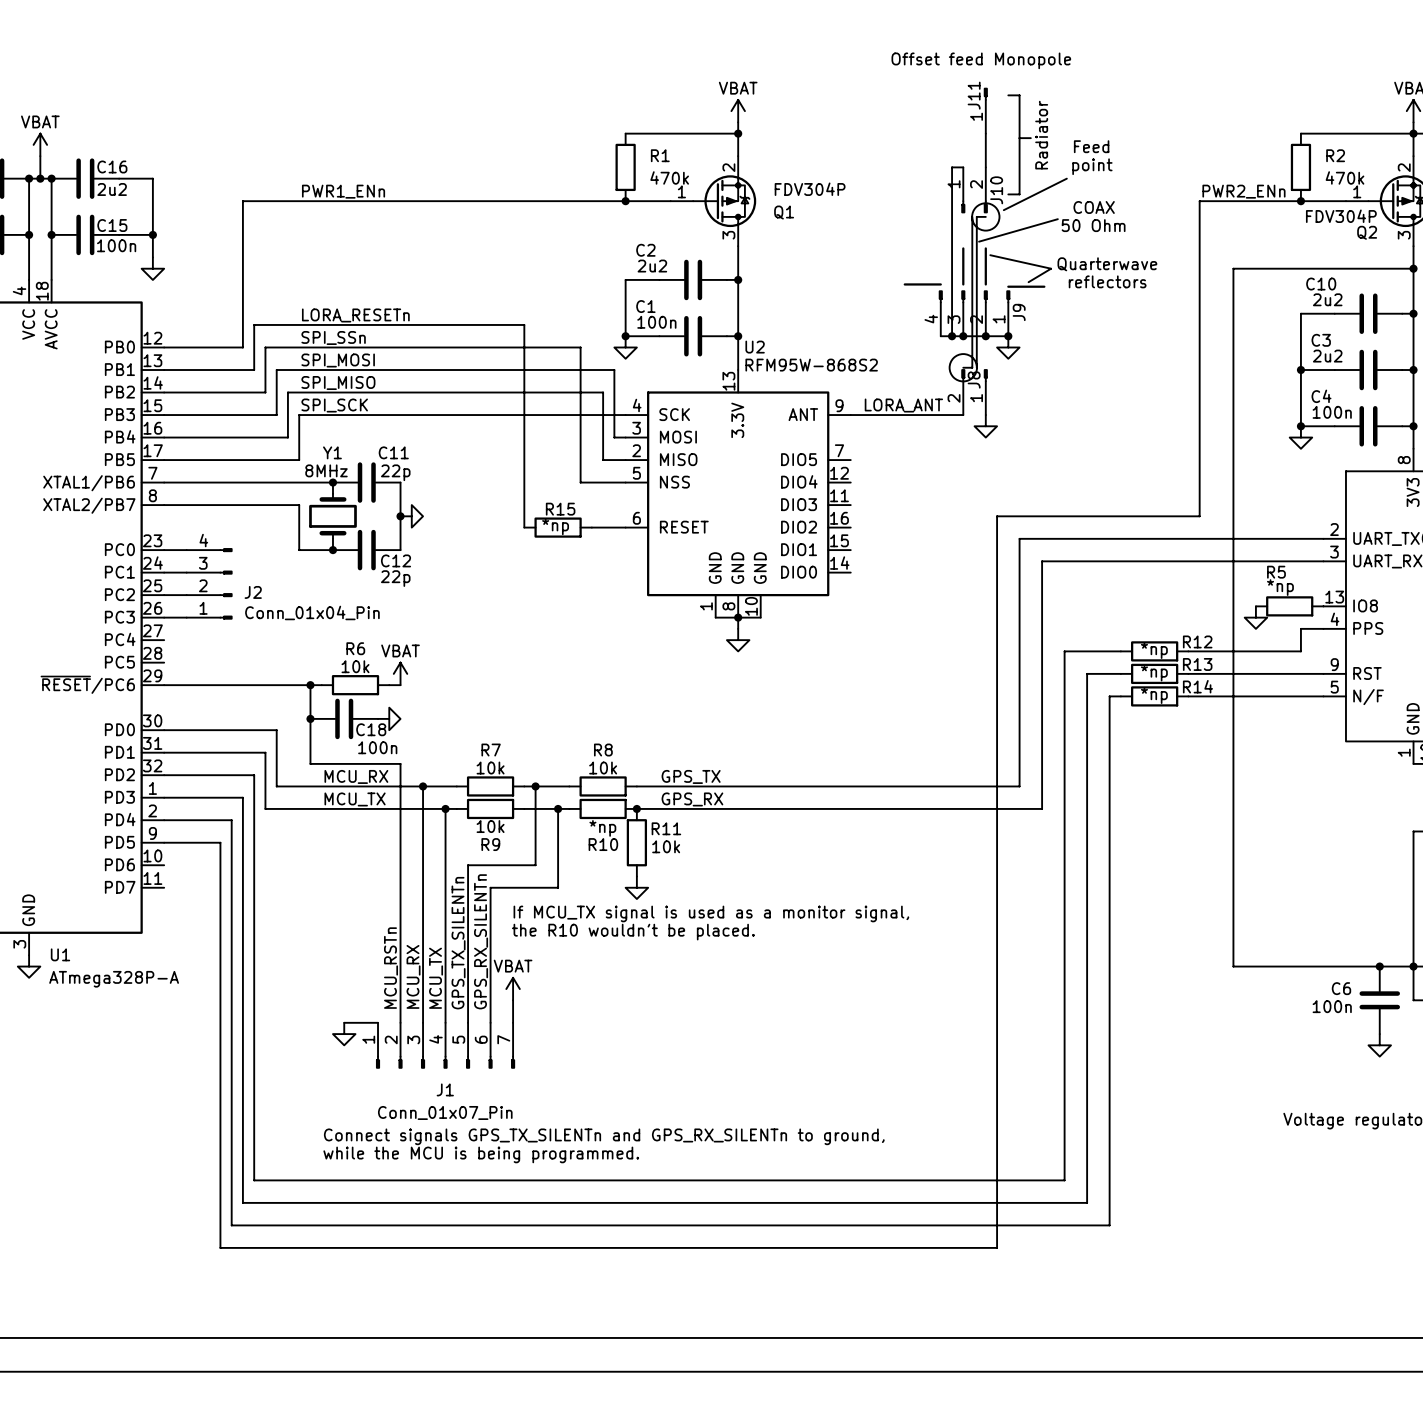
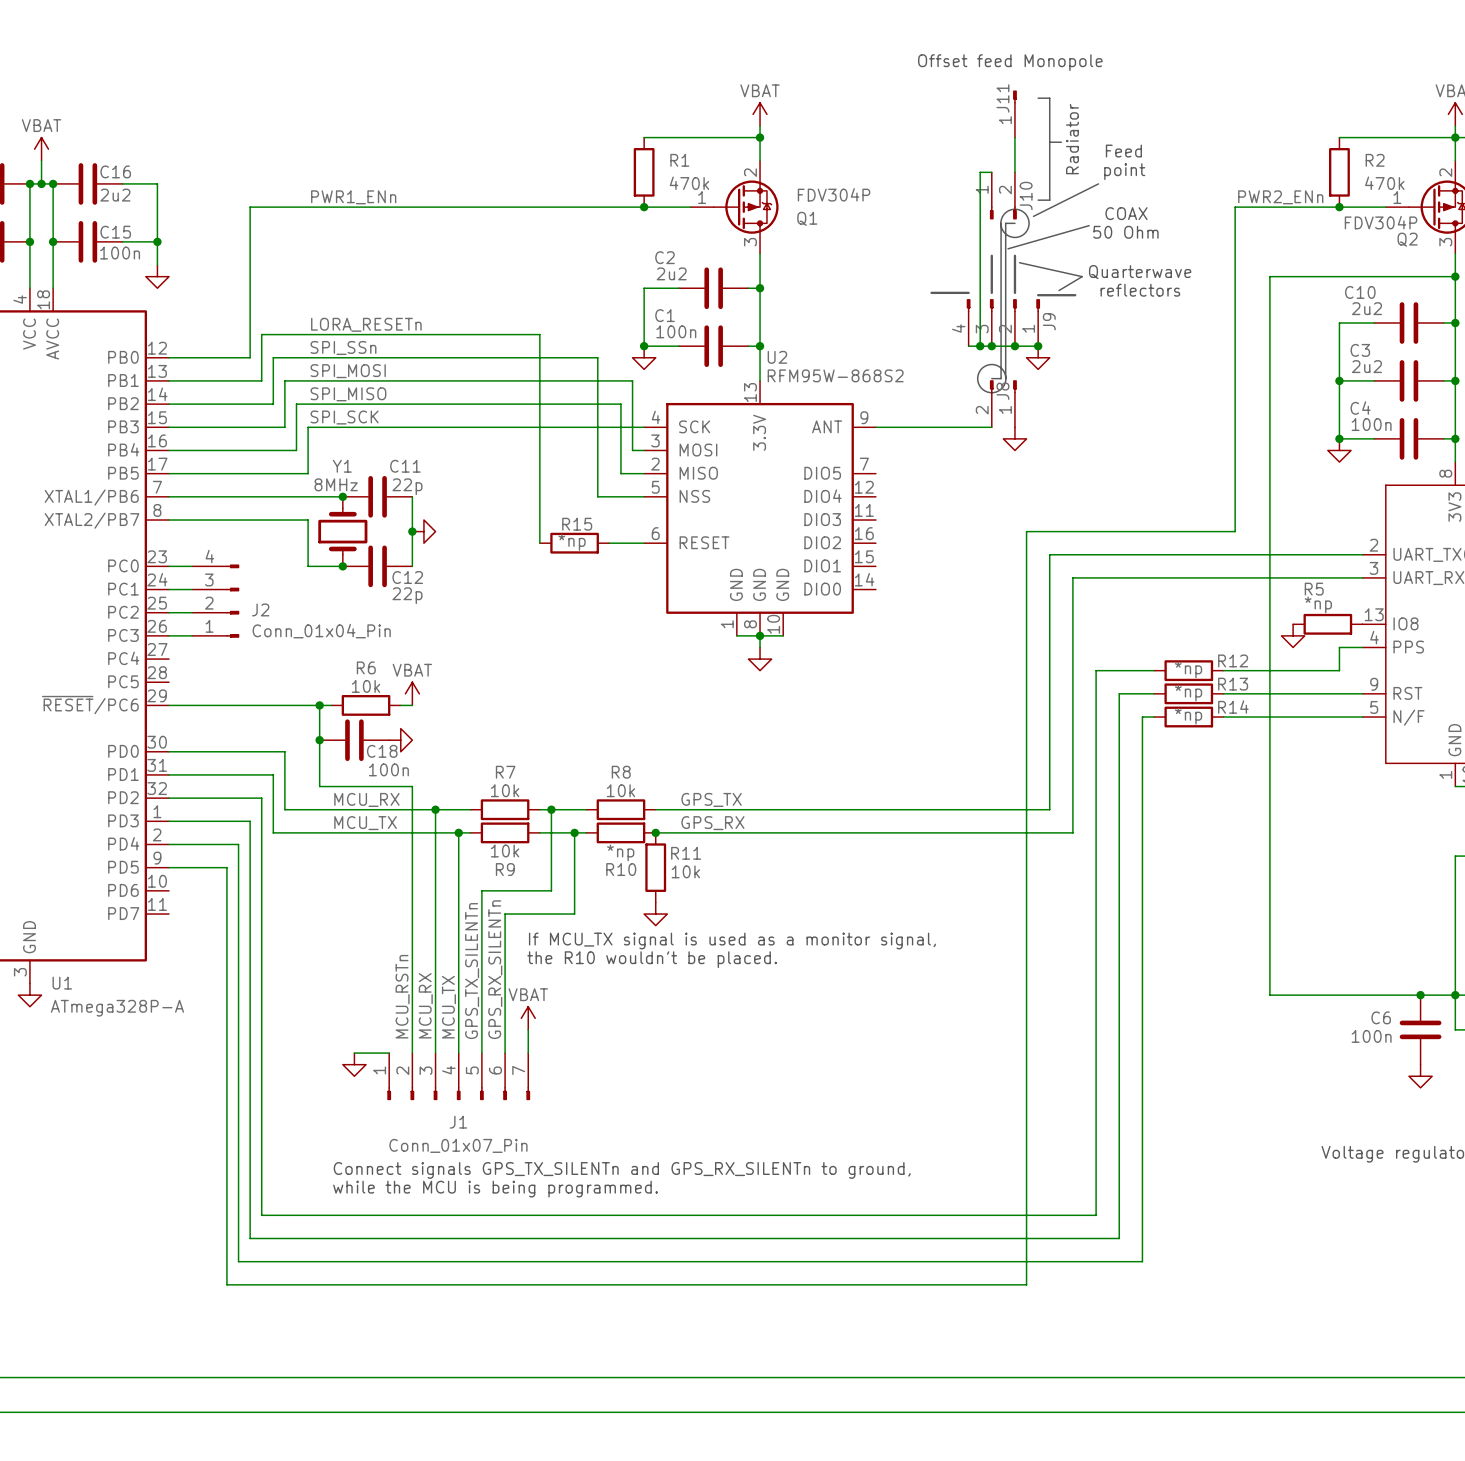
label: LORA_ANT (903, 405) -> none

